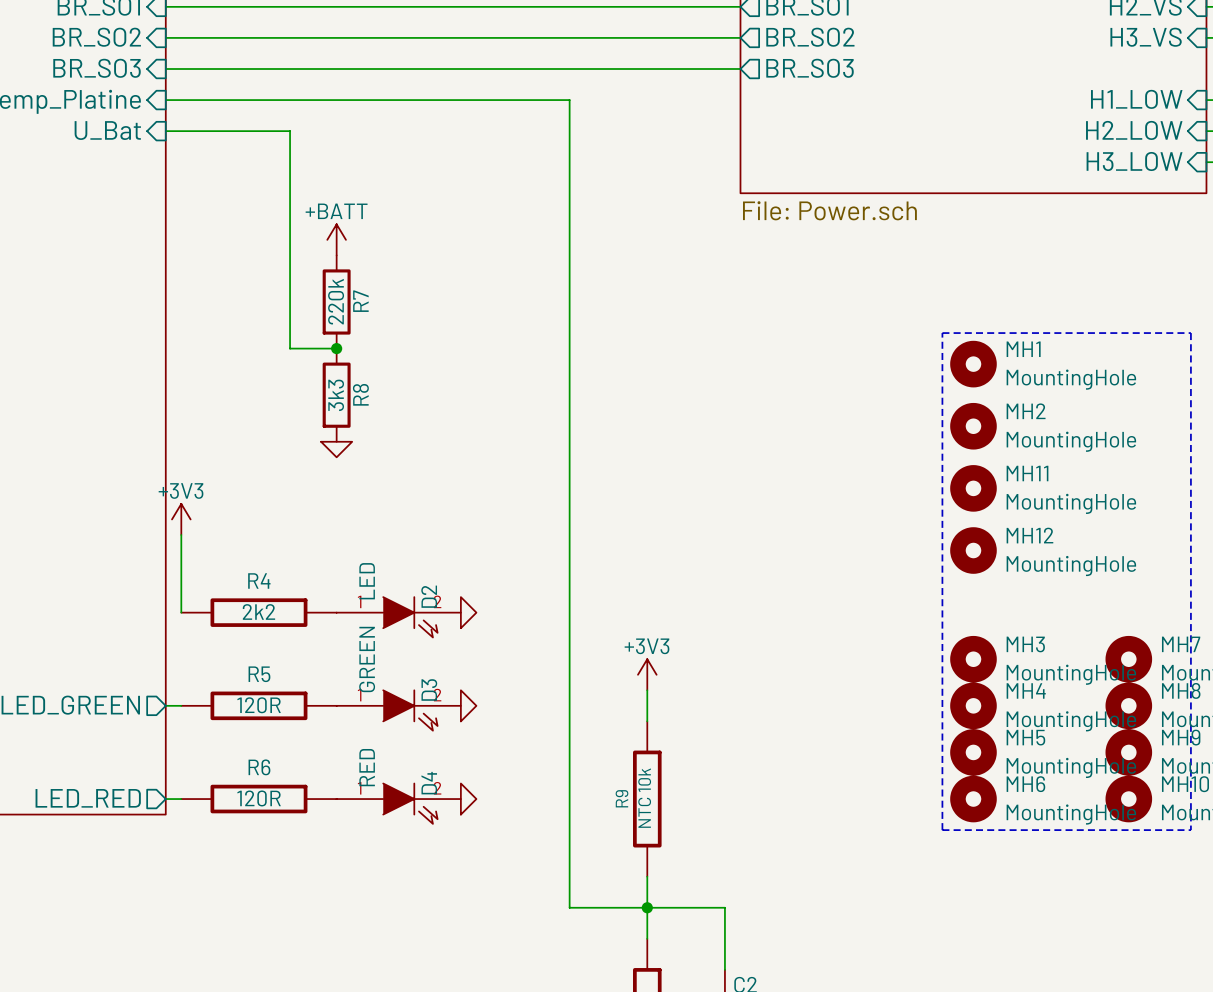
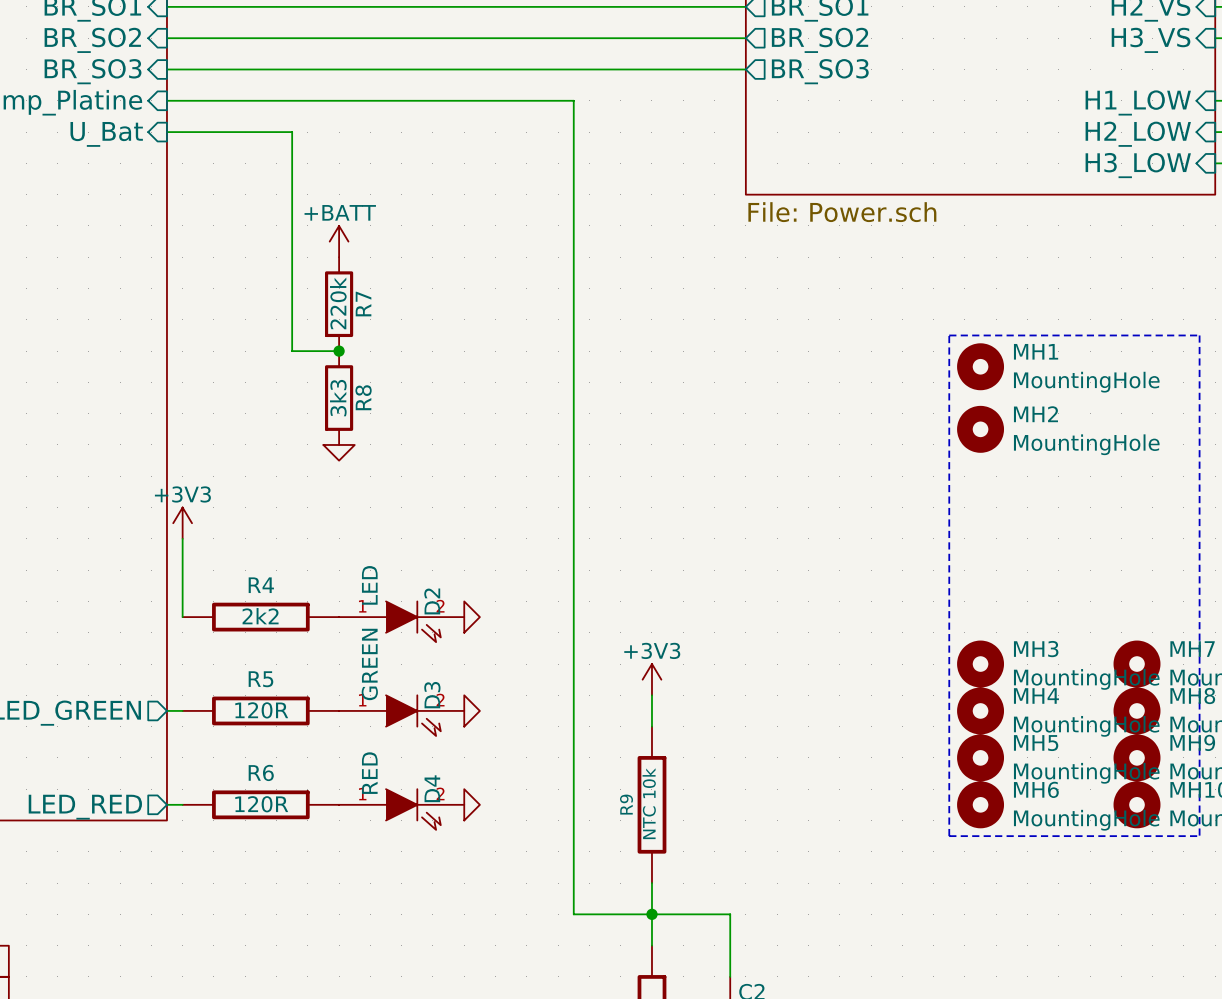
MH11: MountingHole (973, 488) -> none
MH12: MountingHole (973, 550) -> none

